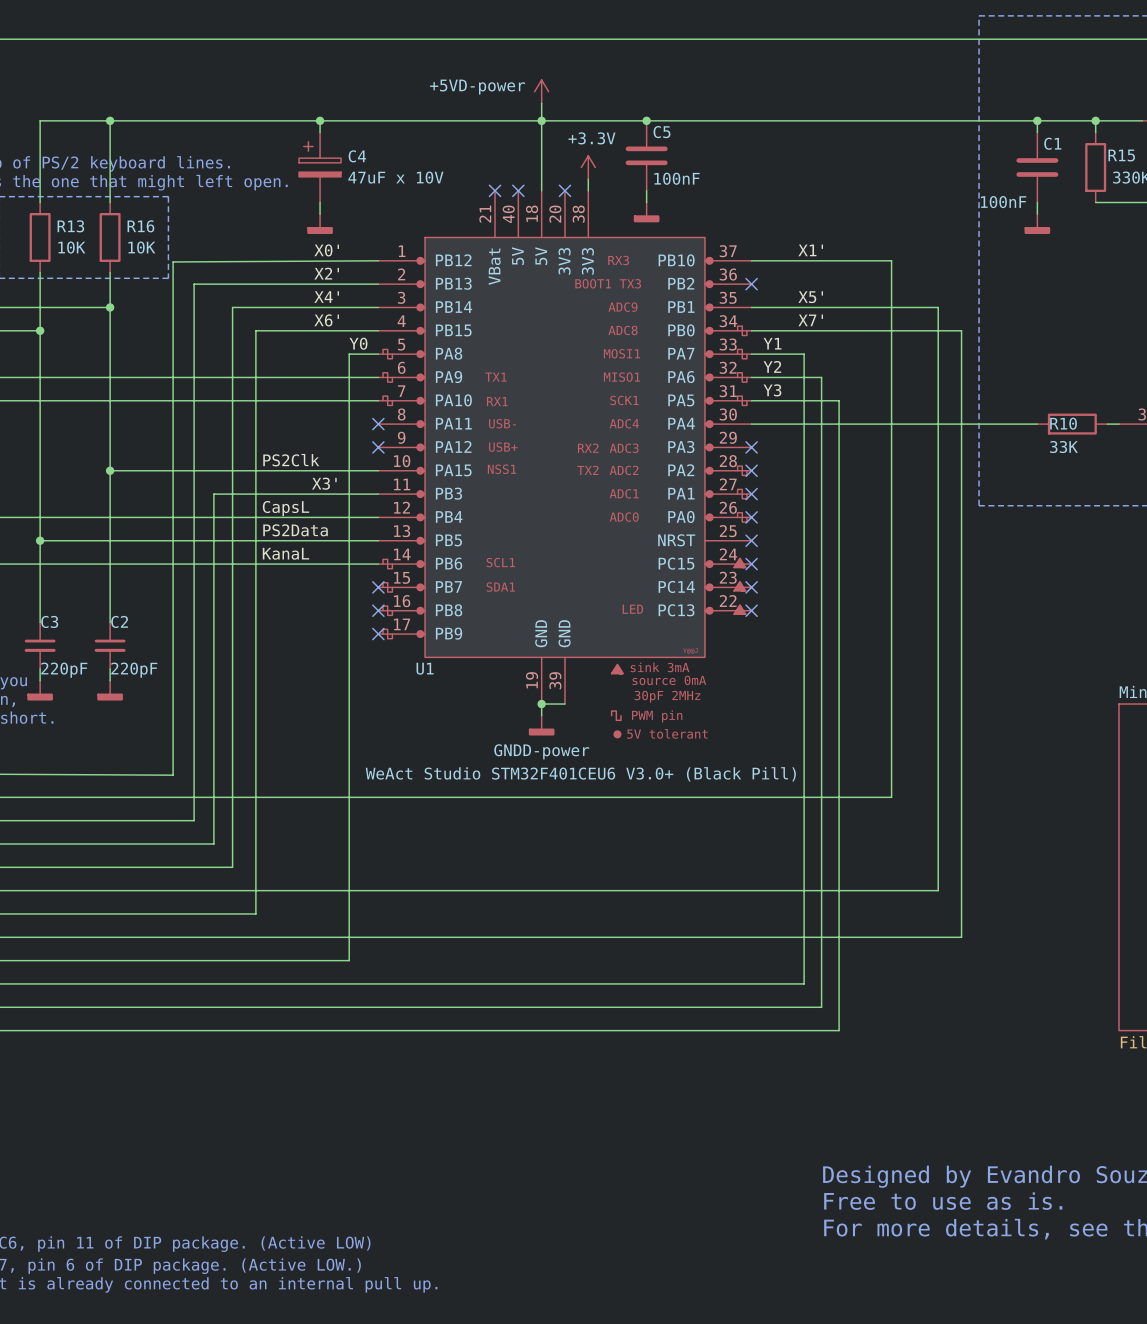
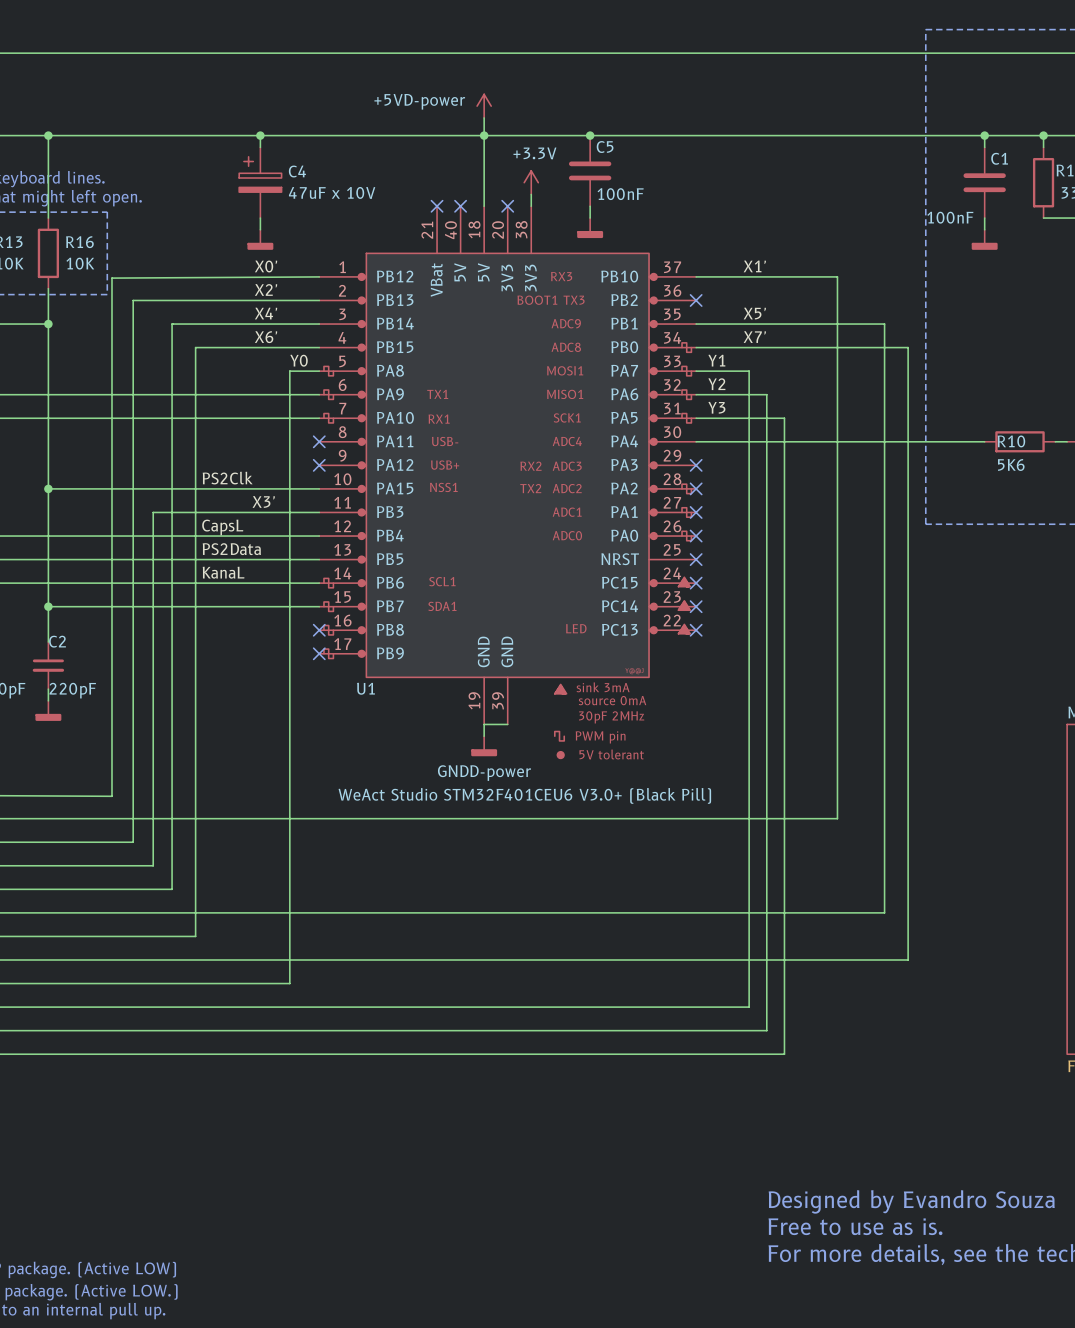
R10 value: 33K (1063, 447) -> 5K6 (1011, 464)
wire: none -> (48, 606) (319, 606)
junction: none -> (48, 606)
no-connect mark: (378, 587) -> none
junction: (541, 704) -> none

